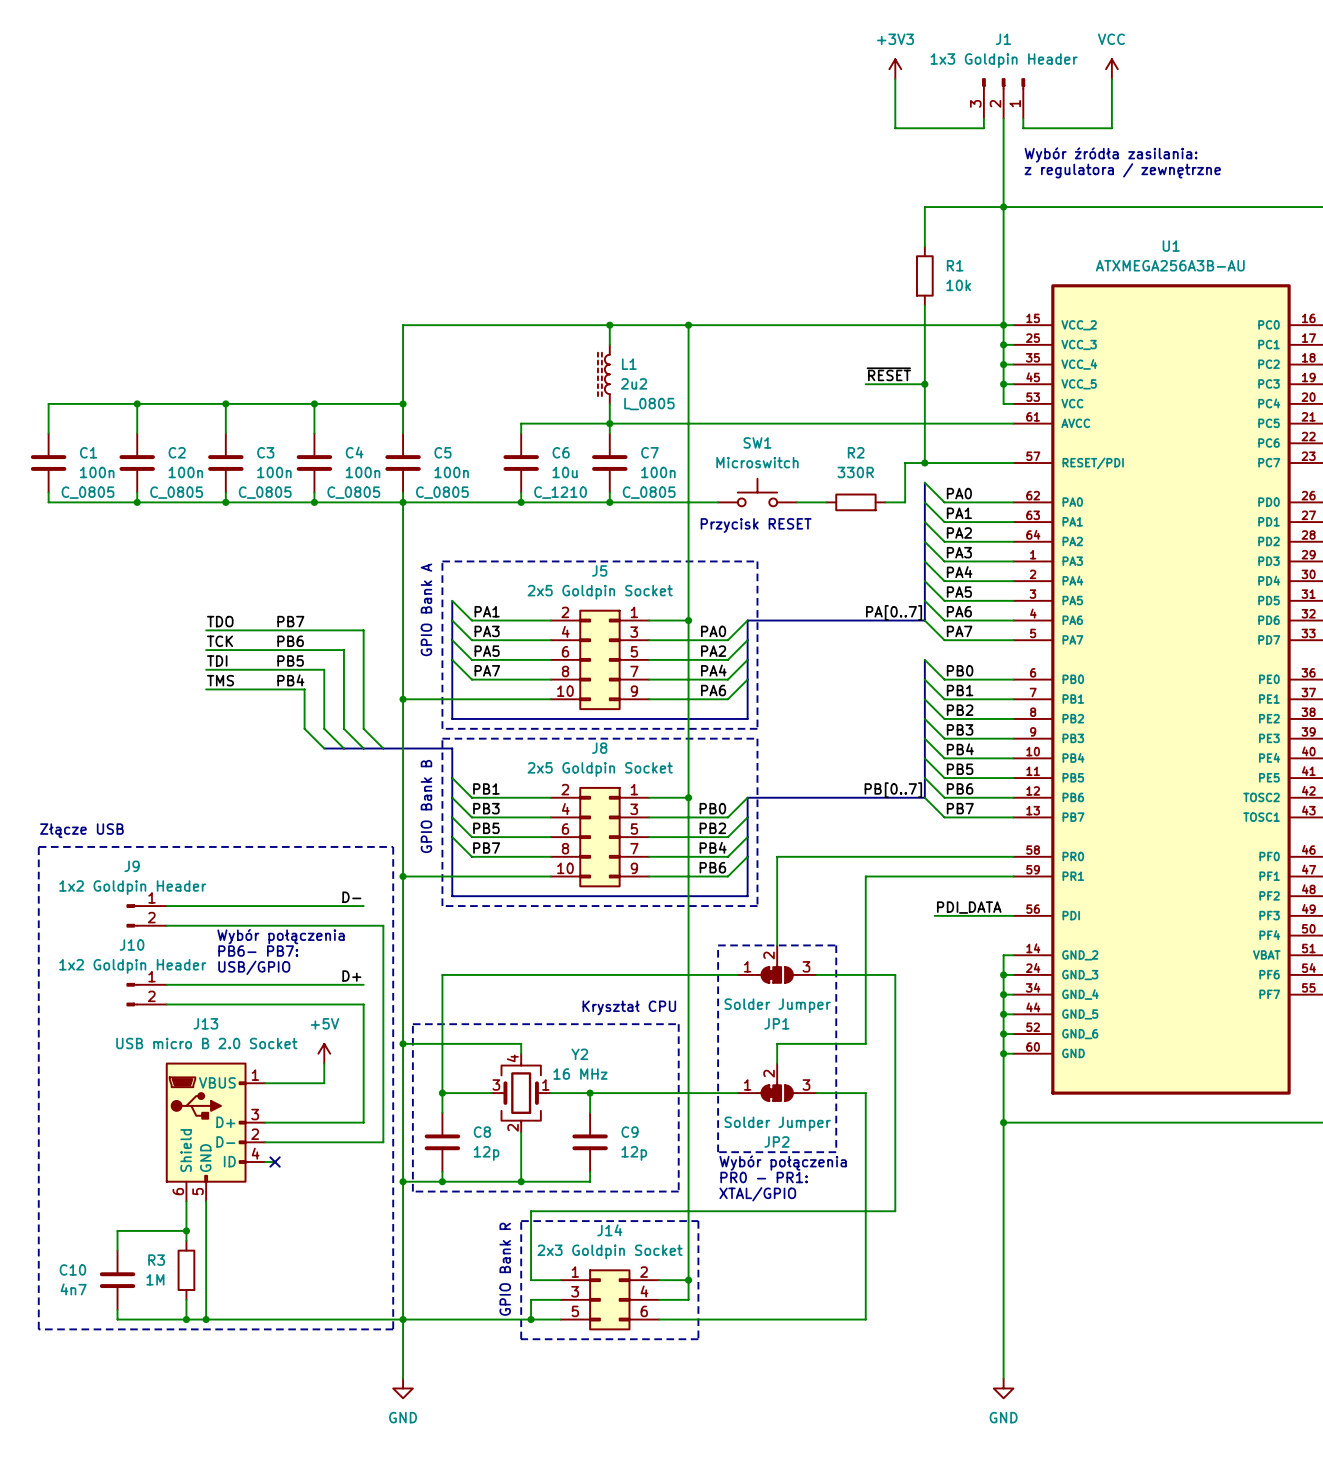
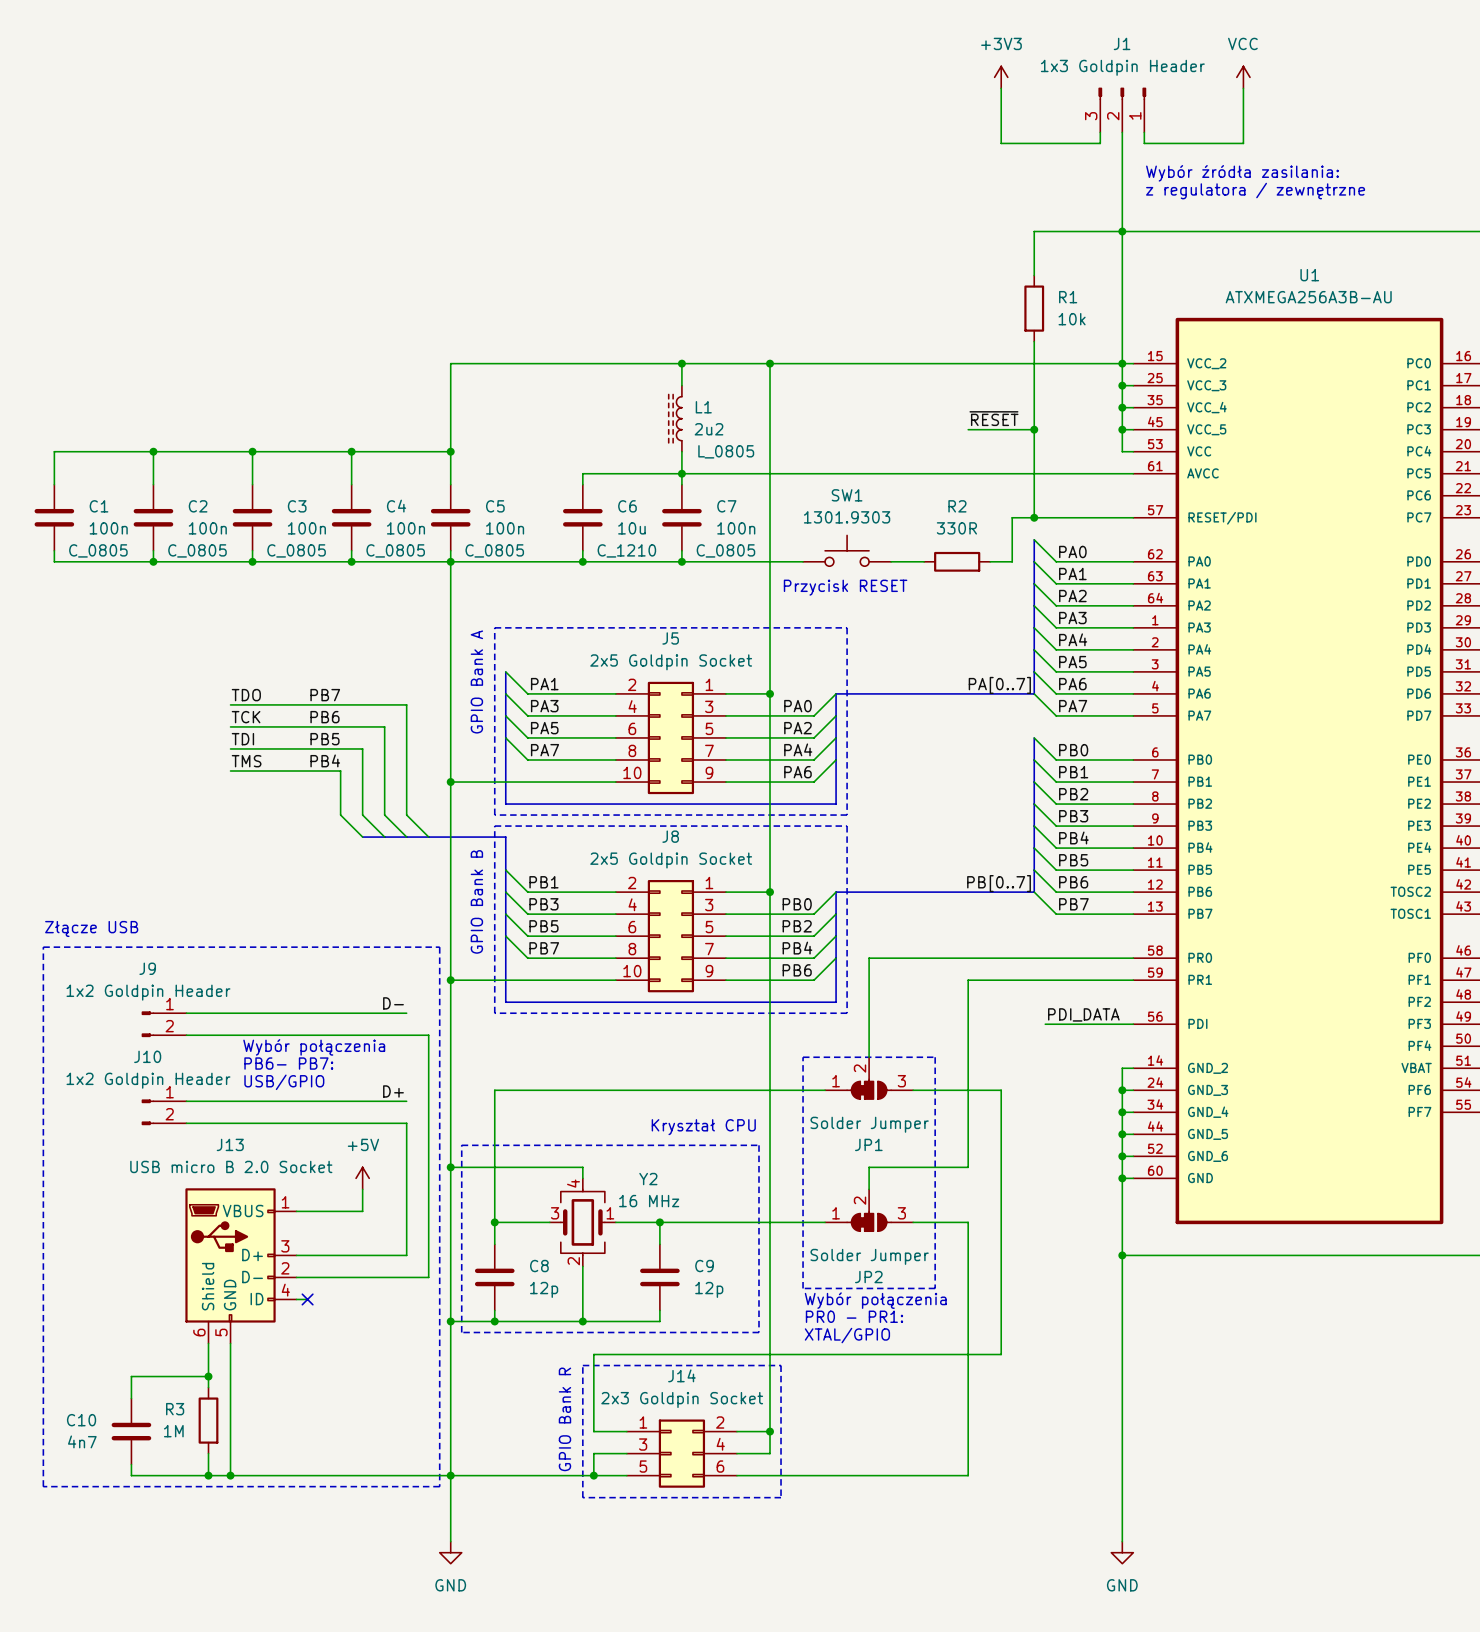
SW1 value: Microswitch (757, 462) -> 1301.9303 (847, 517)

